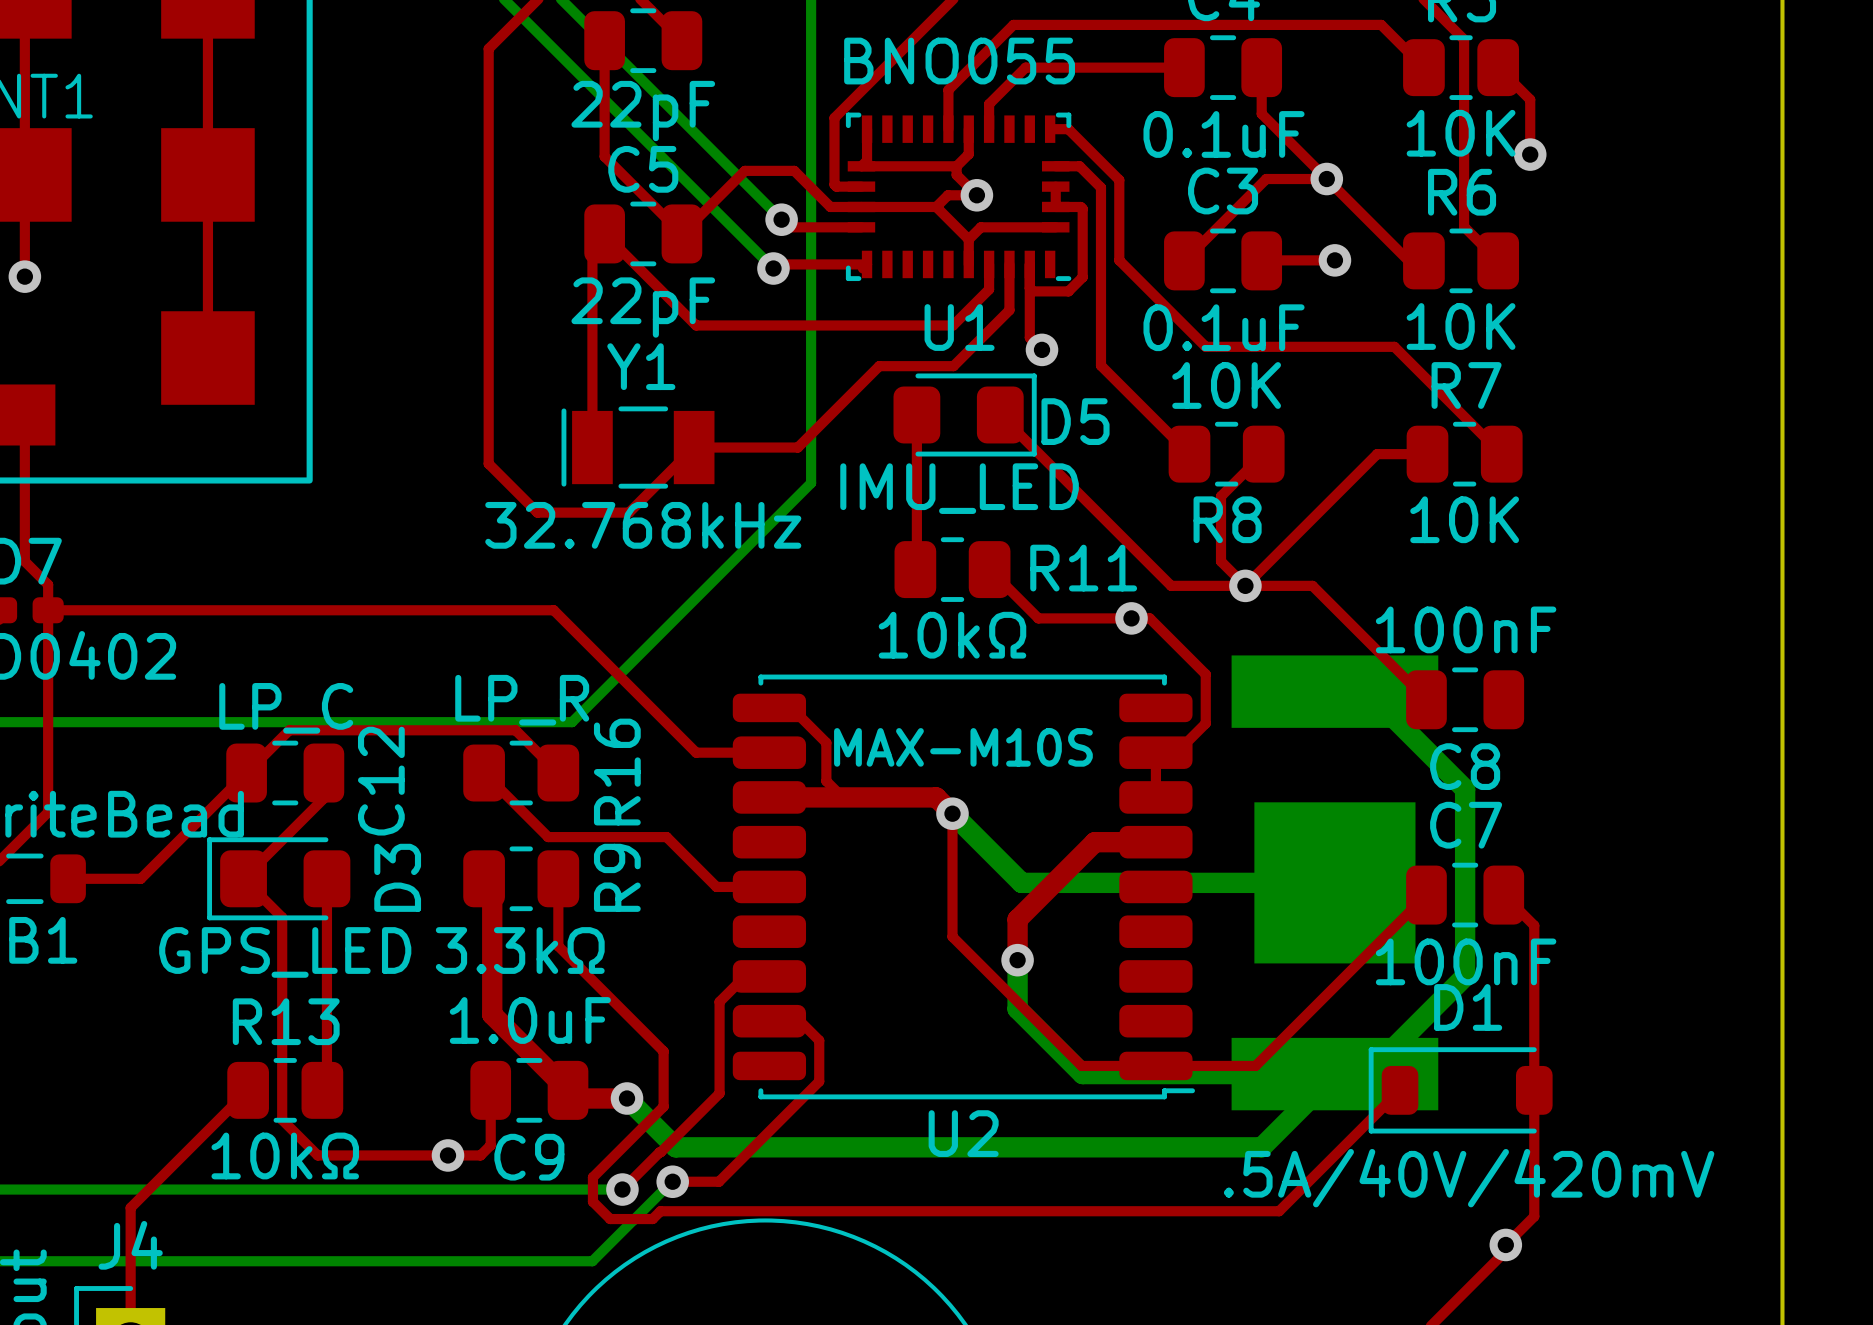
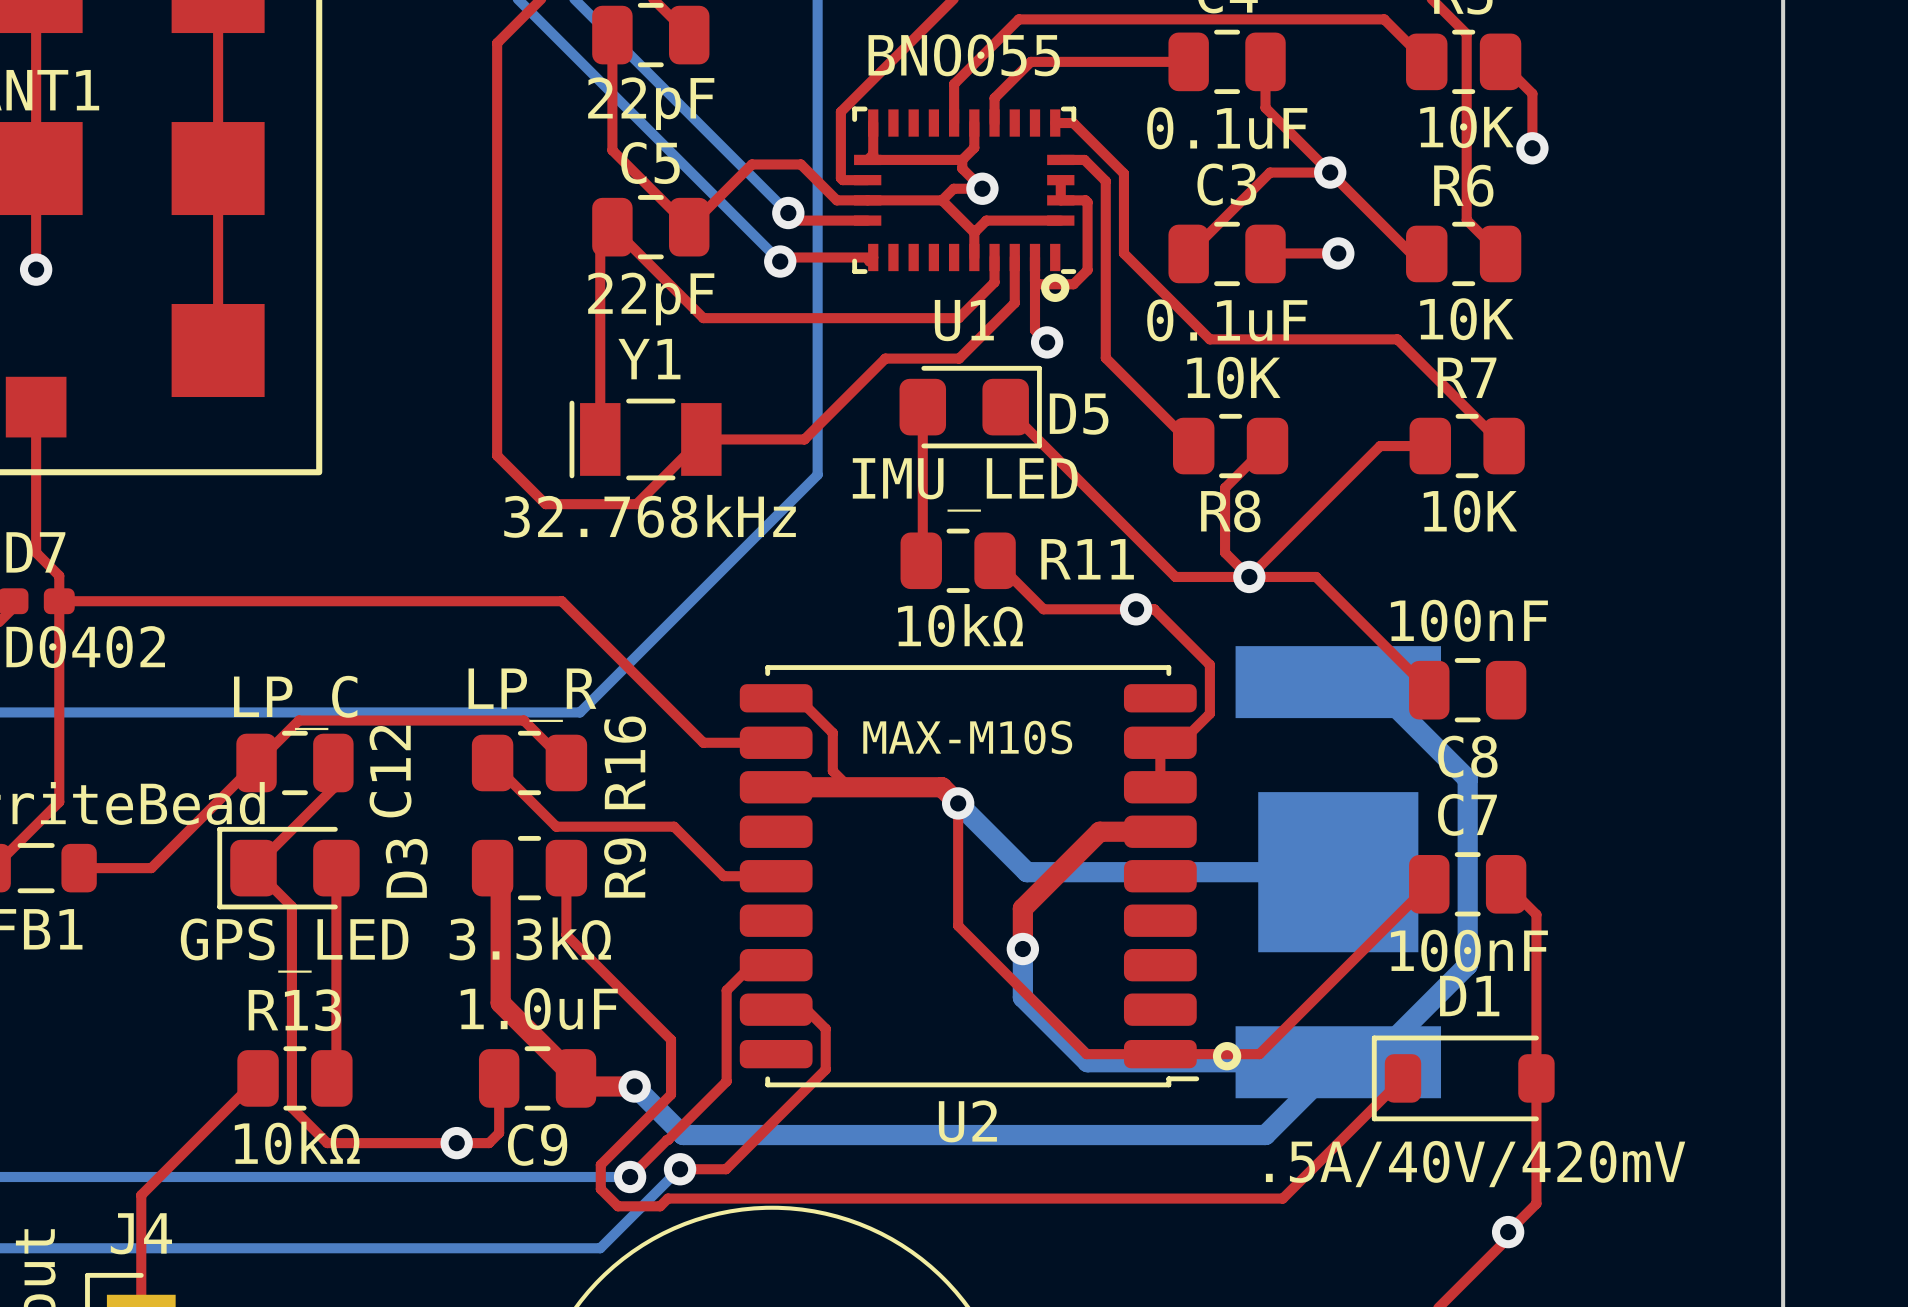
drawing: none -> [1041, 273, 1070, 302]
drawing: none -> [1212, 1042, 1242, 1071]

